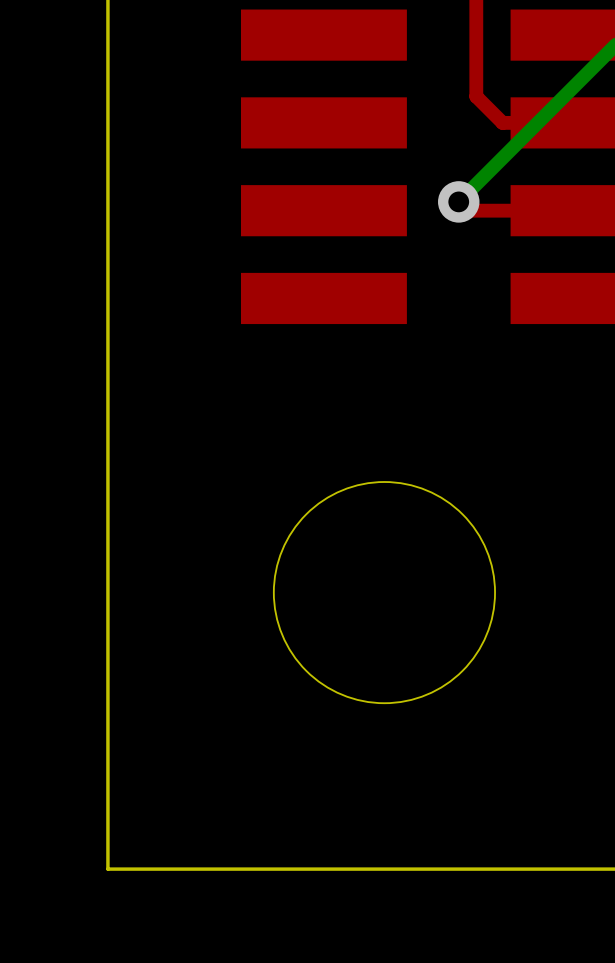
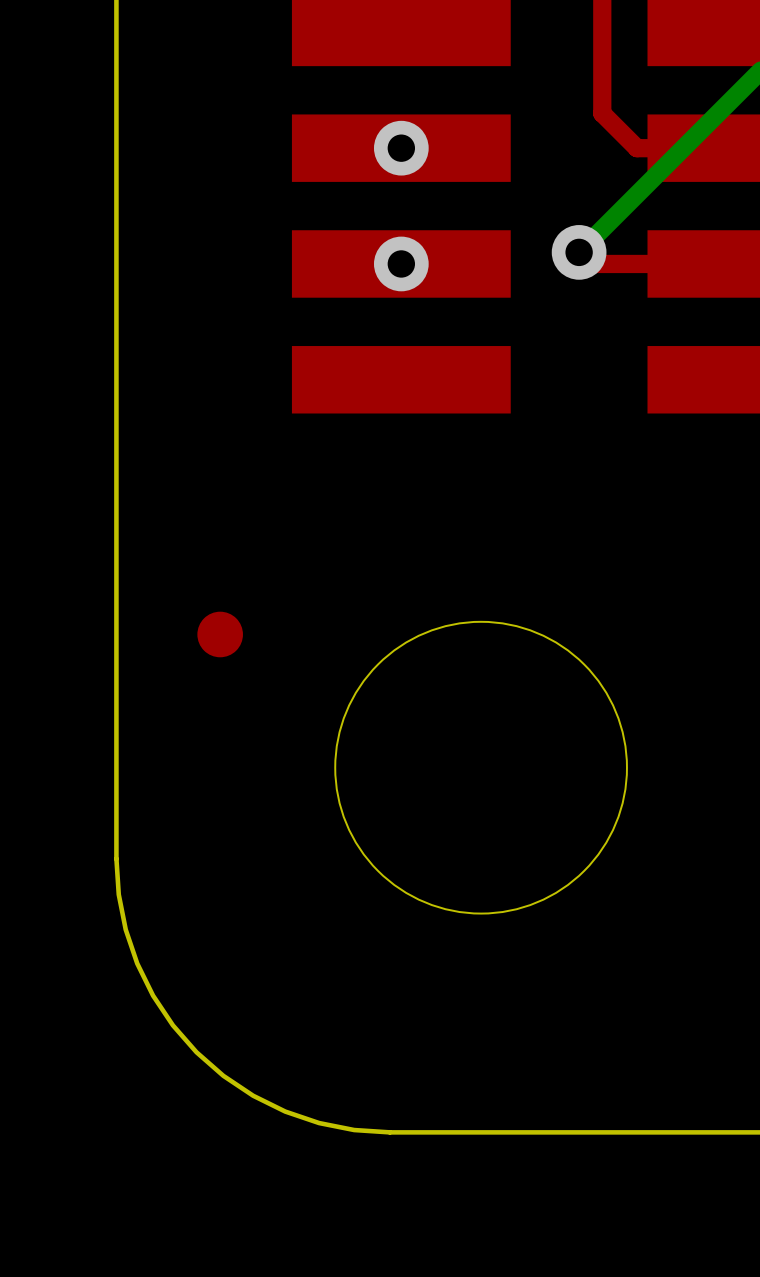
via: none -> (401, 148)
via: none -> (401, 263)
part: none -> (220, 634)
board edge: (107, 661) (107, 869) (315, 869) -> (116, 858) (118, 894) (125, 929) (137, 963) (153, 995) (172, 1025) (196, 1052) (223, 1075) (253, 1095) (285, 1111) (319, 1123) (354, 1130) (389, 1132)

